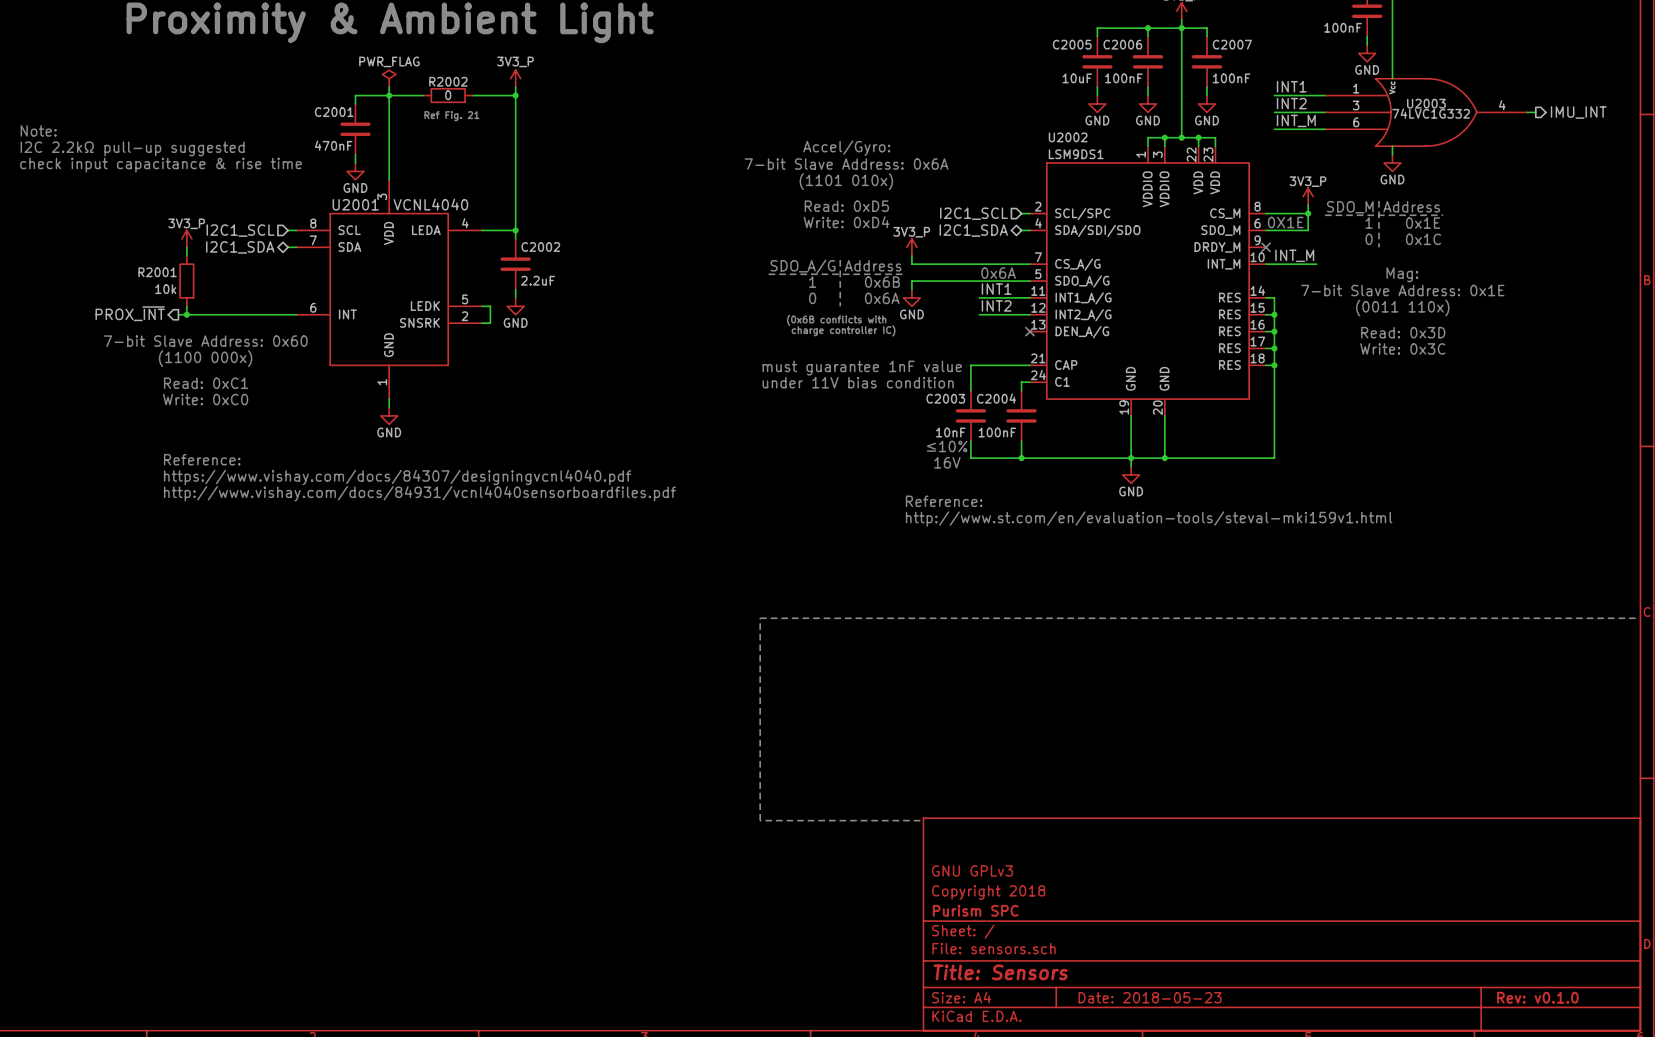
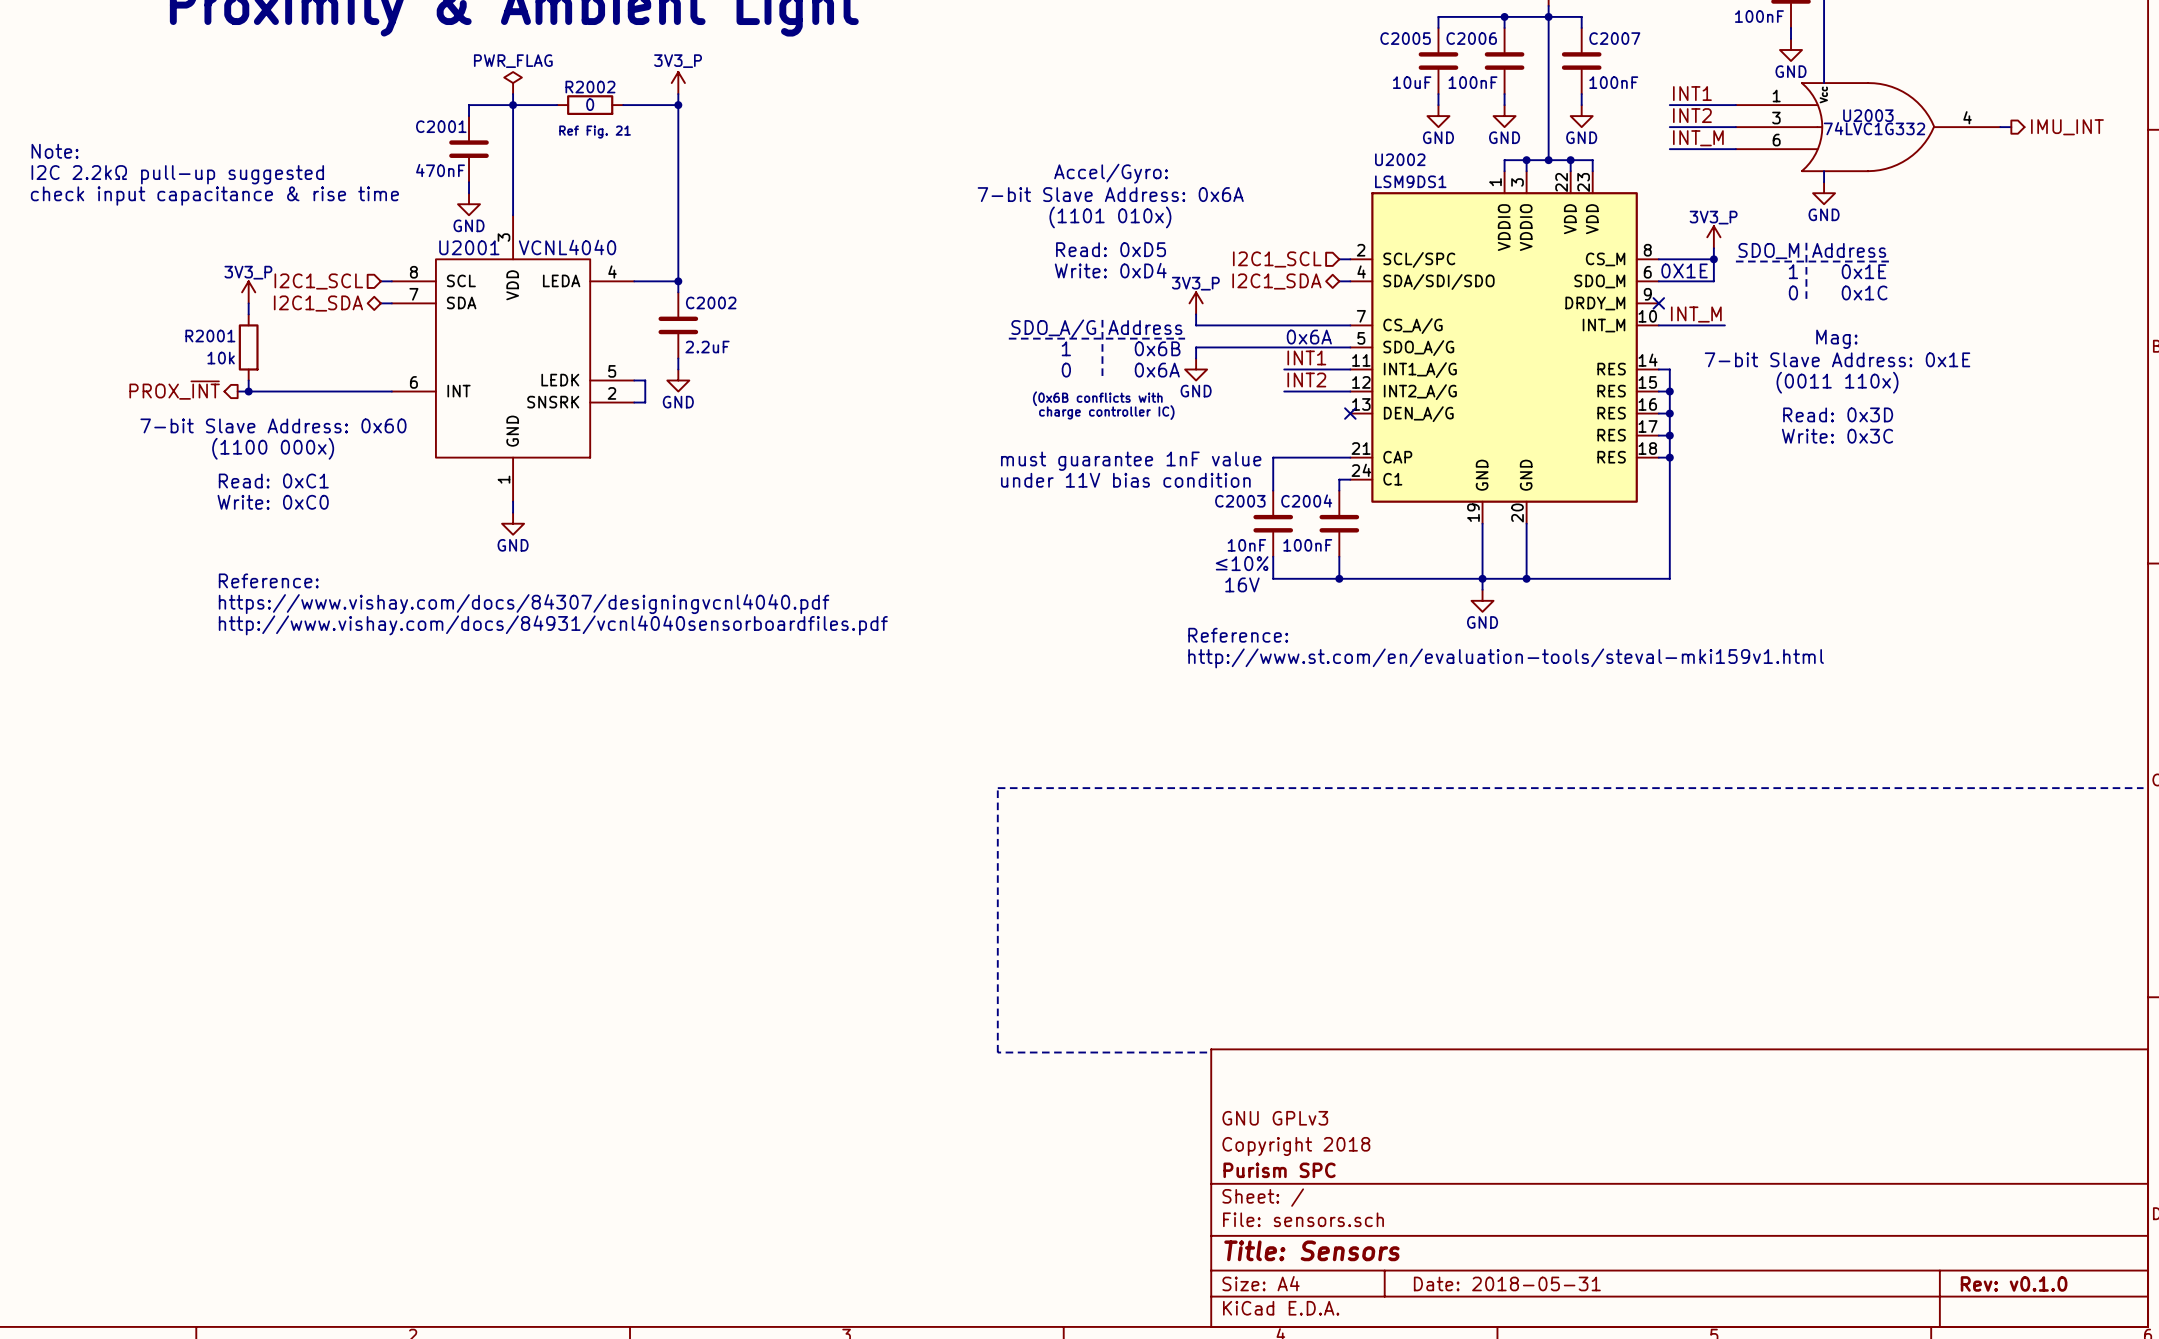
title block: Date: 2018-05-23 (1150, 997) -> Date: 2018-05-31 (1507, 1283)

